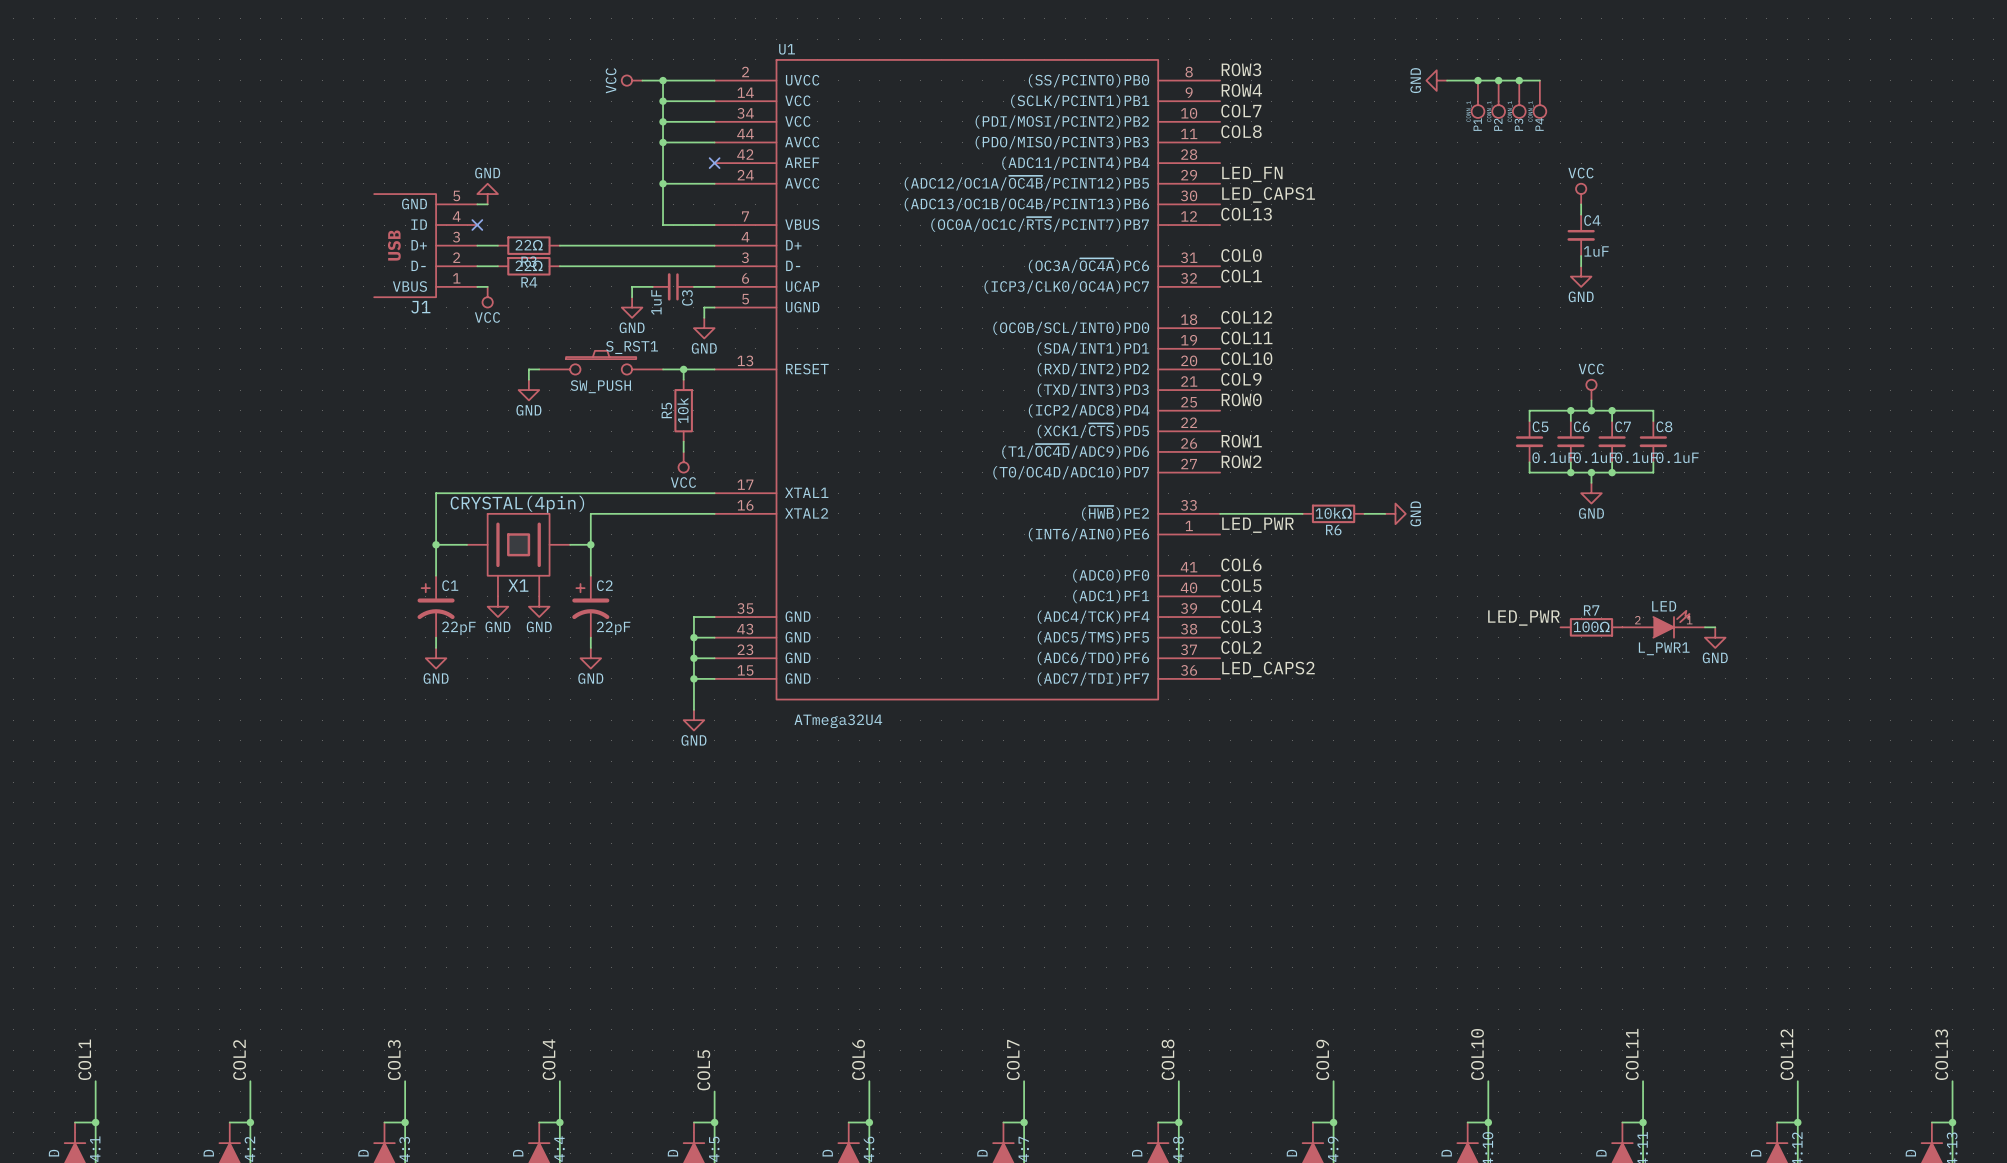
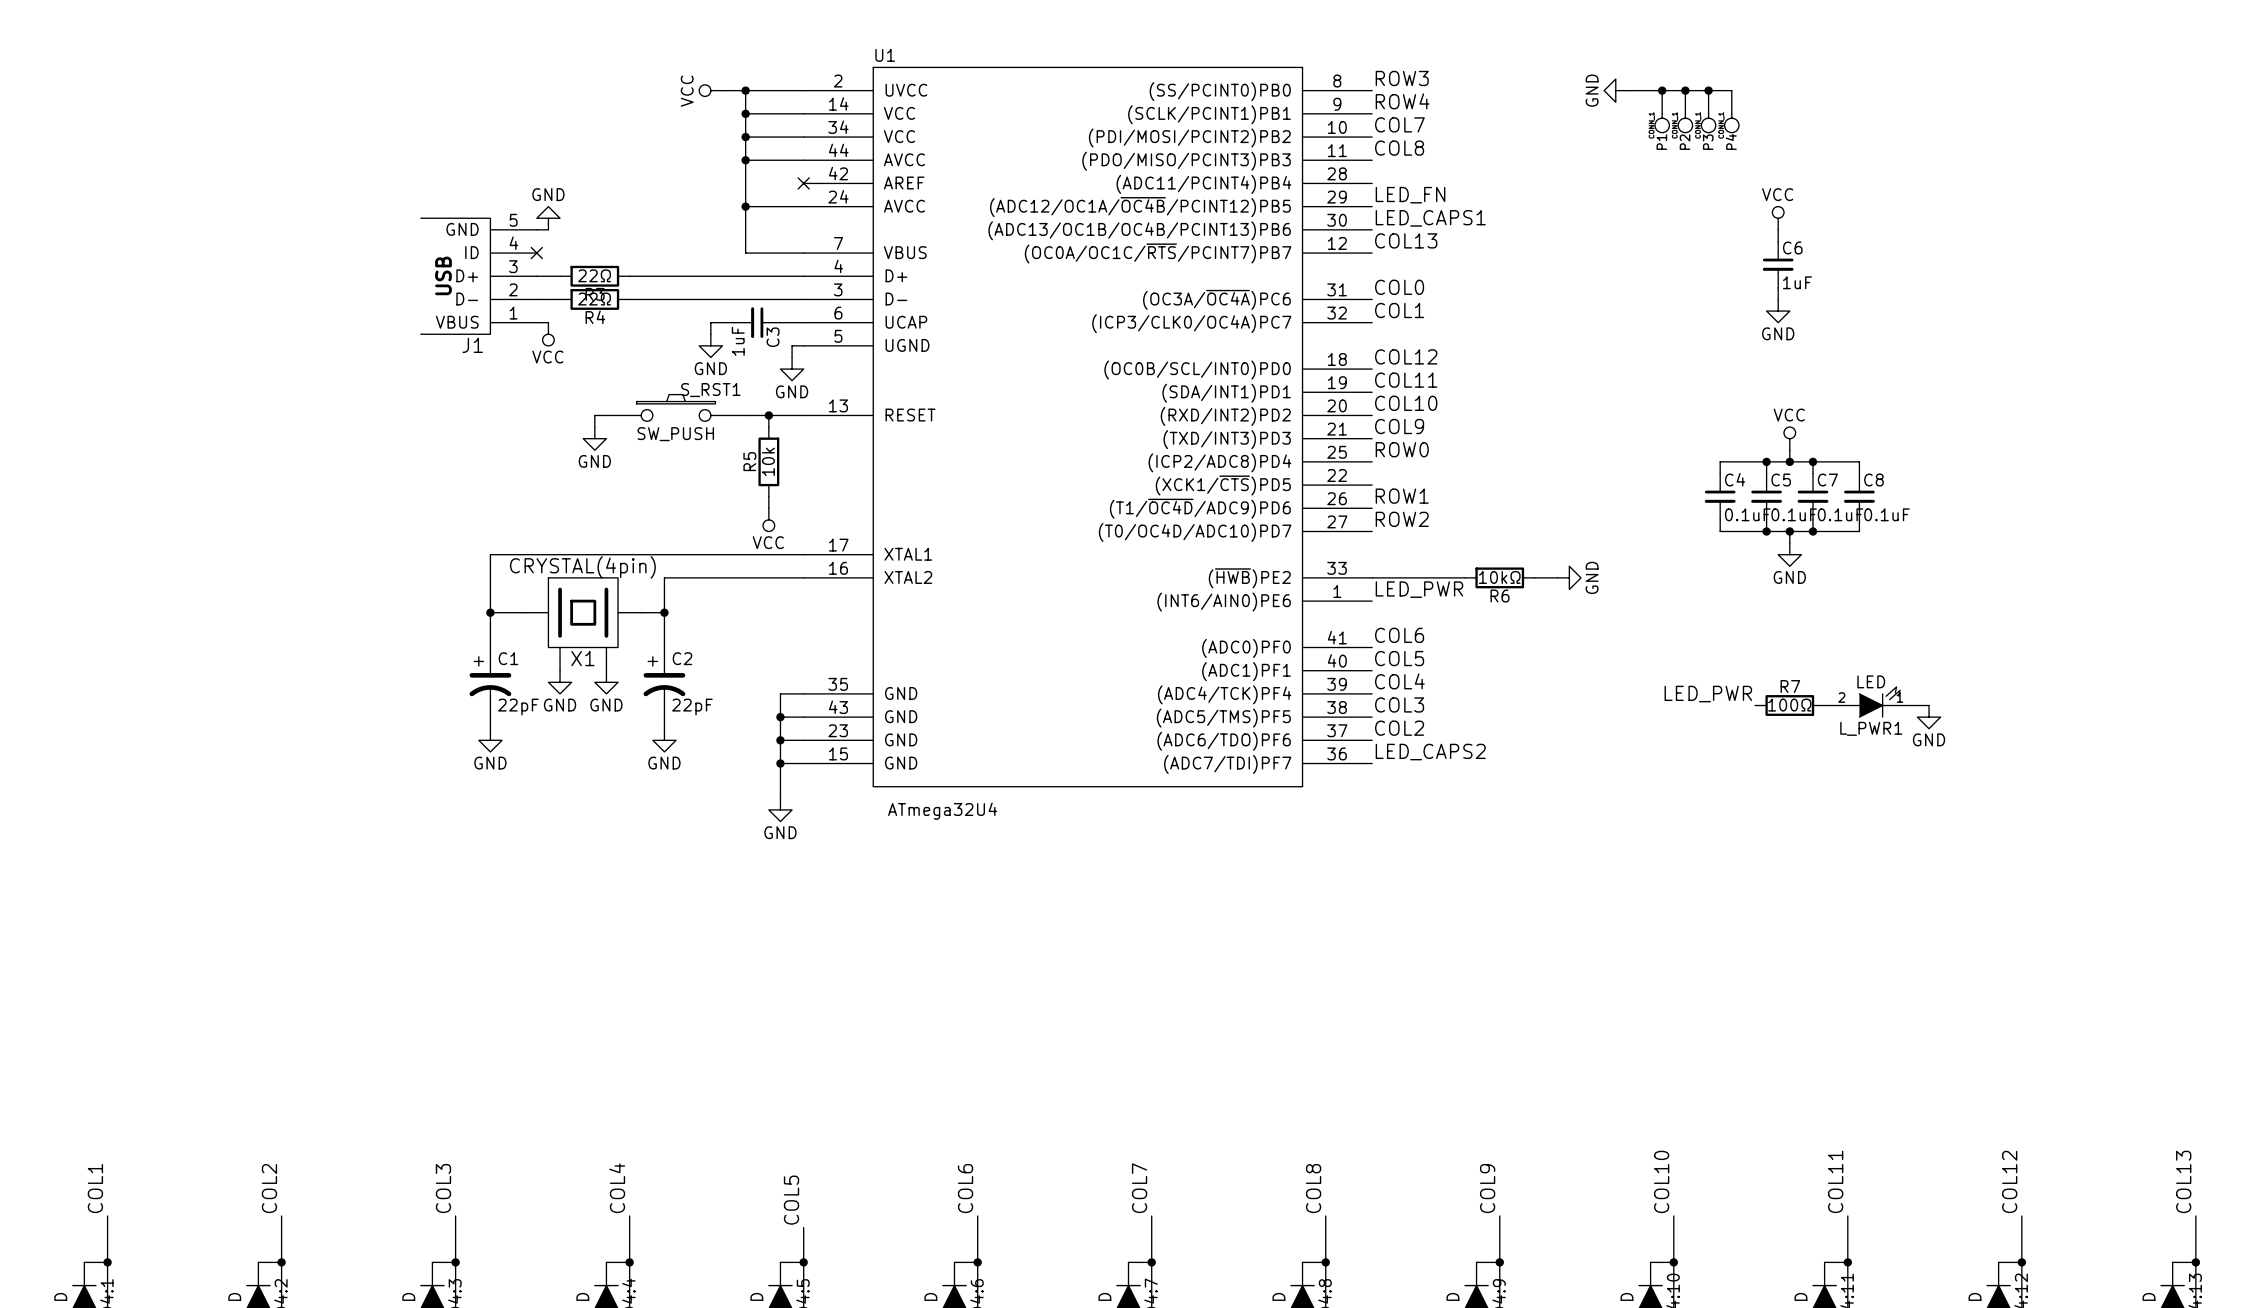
C4 name: C4 (1592, 220) -> C6 (1792, 247)
C5 name: C5 (1540, 426) -> C4 (1735, 479)
C6 name: C6 (1581, 426) -> C5 (1781, 480)

